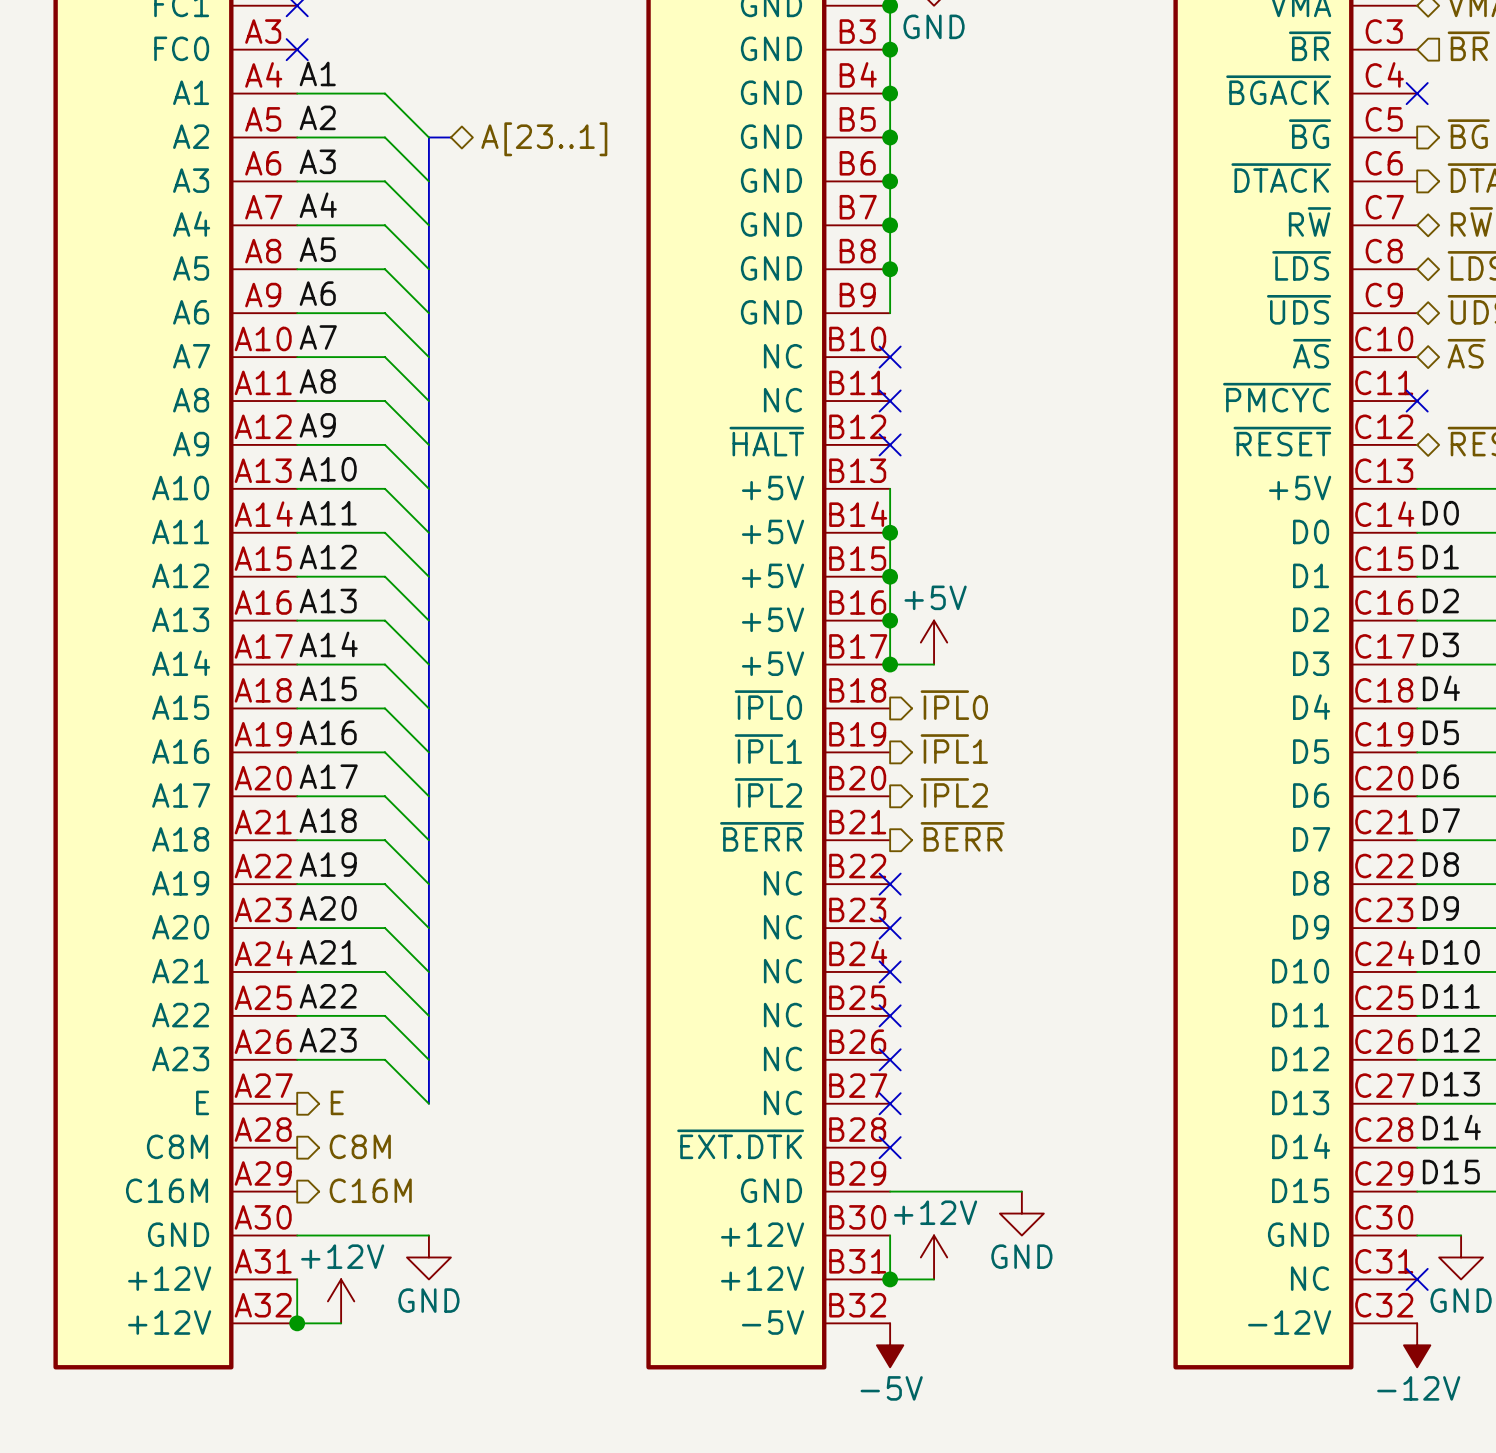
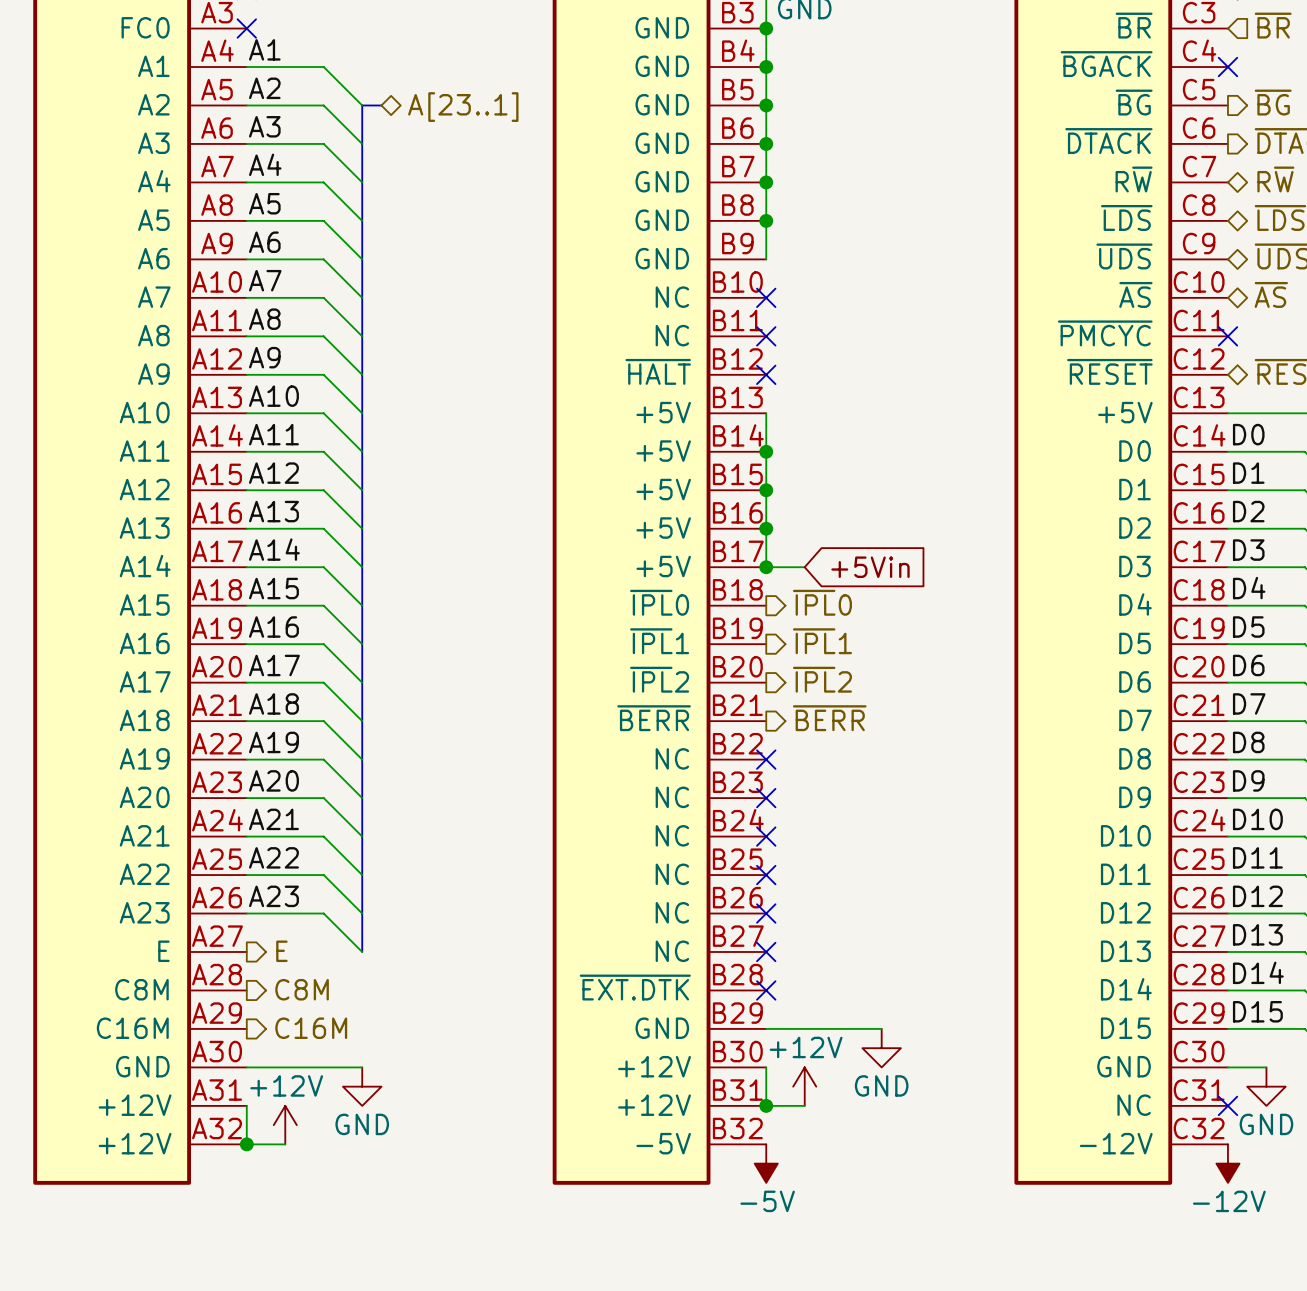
power symbol: +5V (934, 642) -> none
global label: none -> +5Vin (870, 567)

